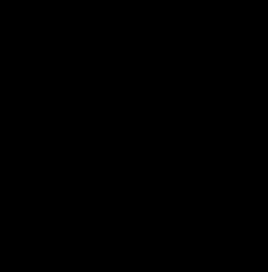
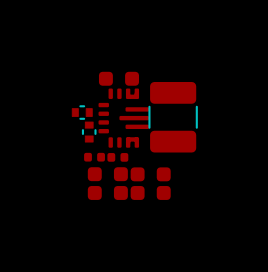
part: none -> (118, 78)
part: none -> (82, 112)
part: none -> (173, 117)
part: none -> (123, 118)
part: none -> (89, 132)
part: none -> (94, 157)
part: none -> (117, 157)
part: none -> (107, 174)
part: none -> (150, 174)
part: none -> (107, 192)
part: none -> (150, 192)

